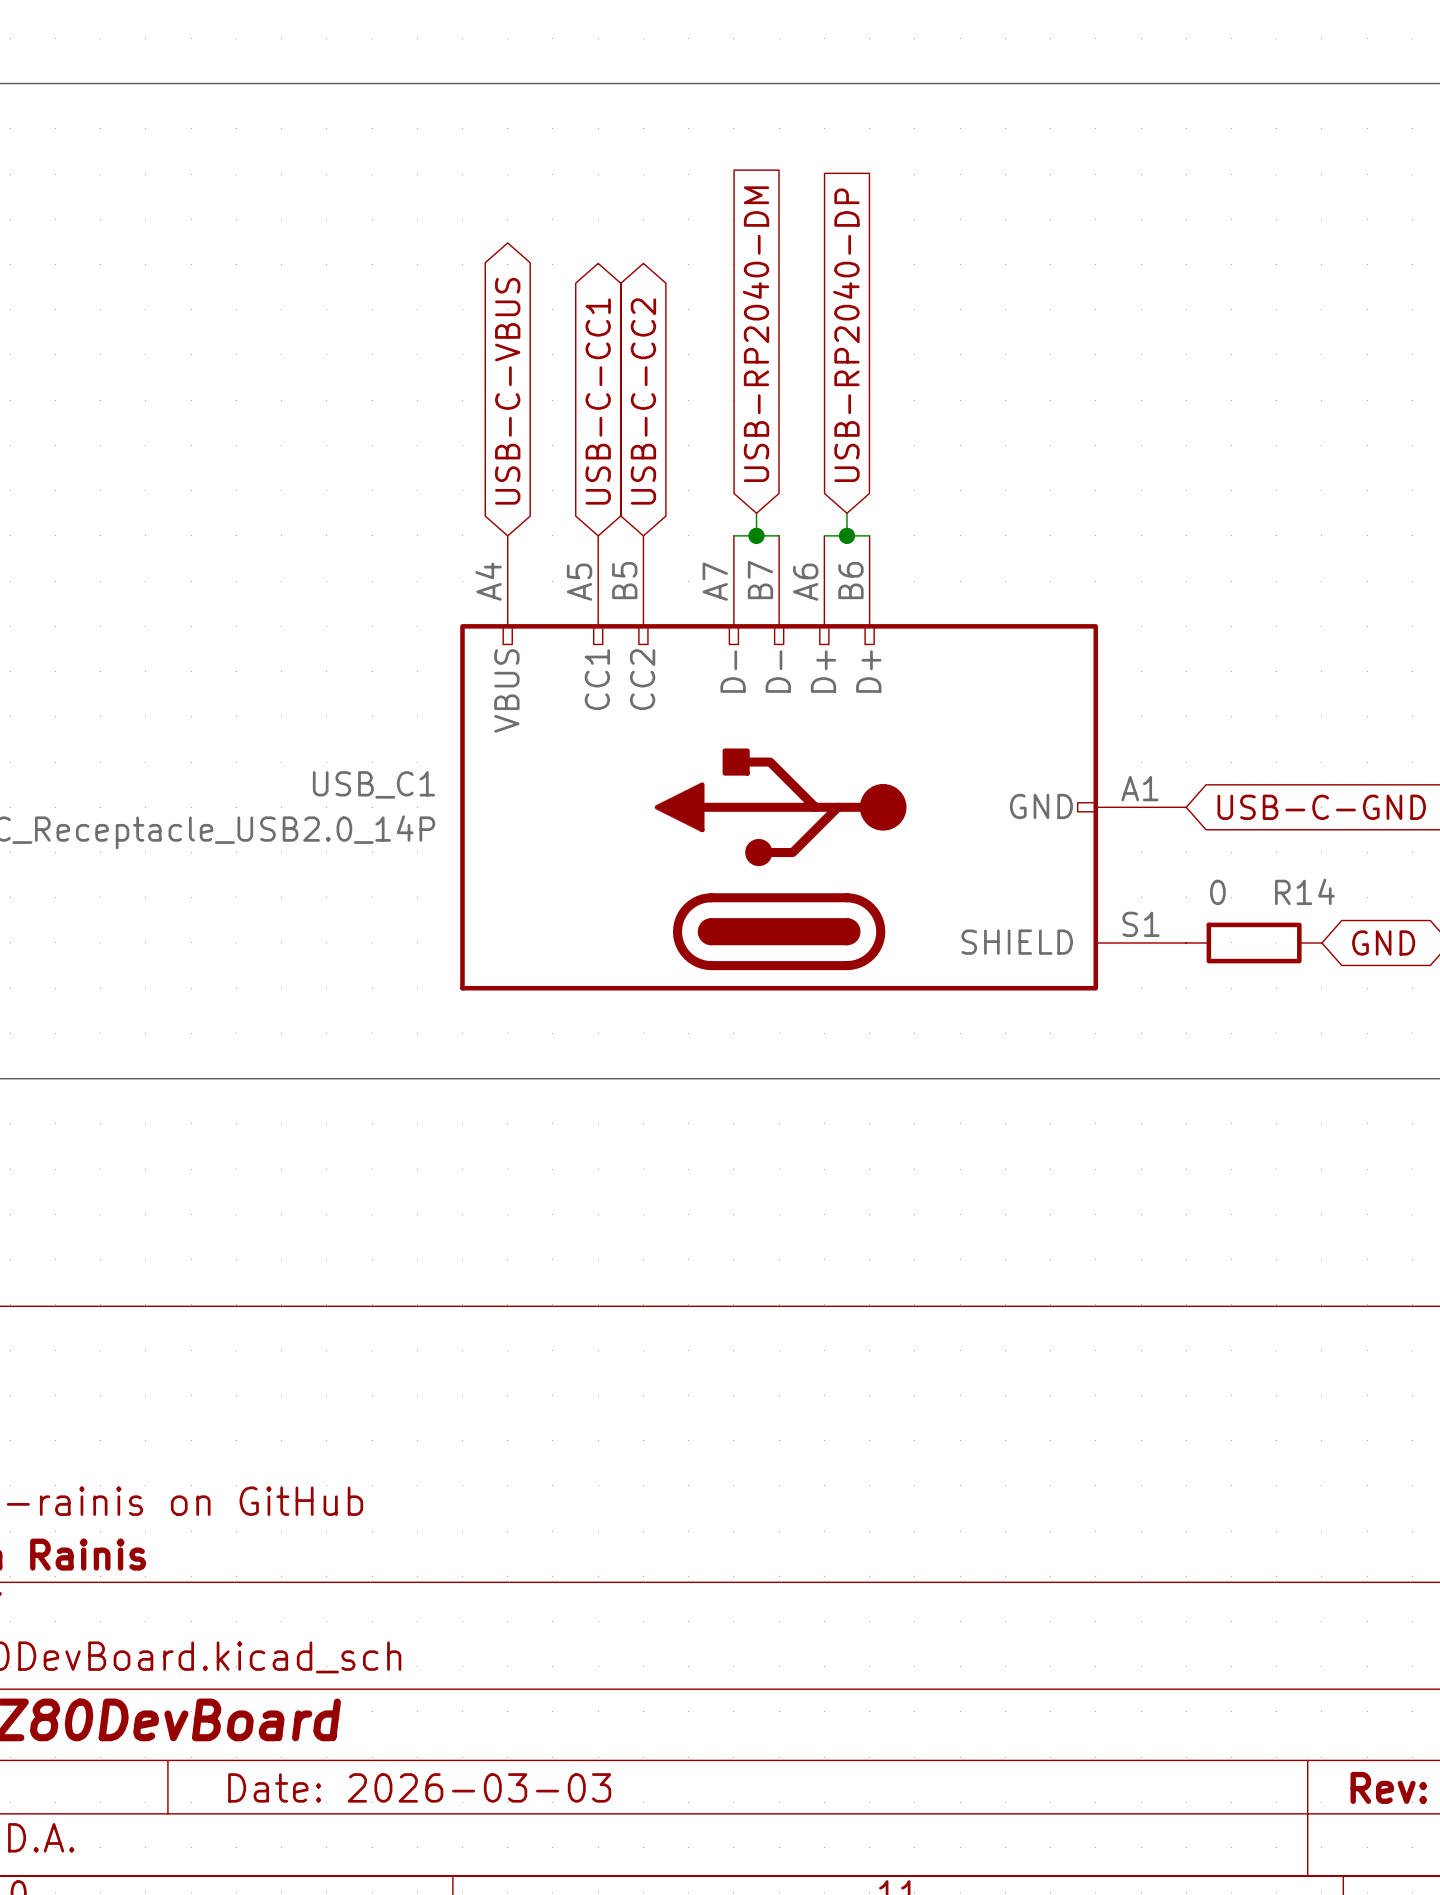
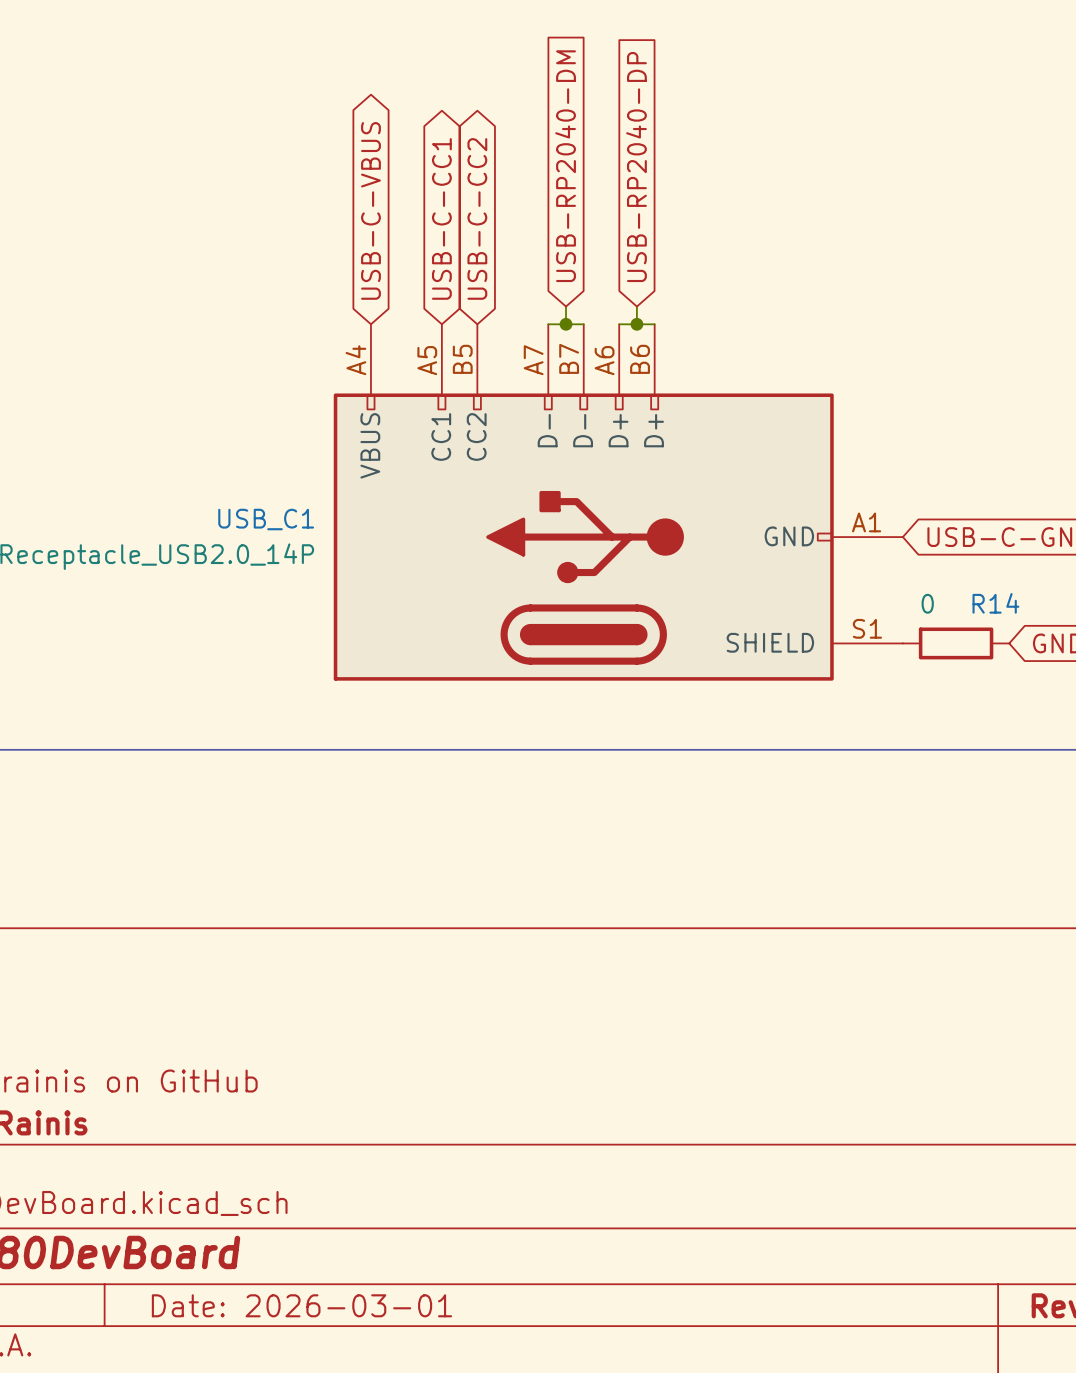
title block: Date: 2026-03-03 (419, 1787) -> Date: 2026-03-01 (301, 1305)

